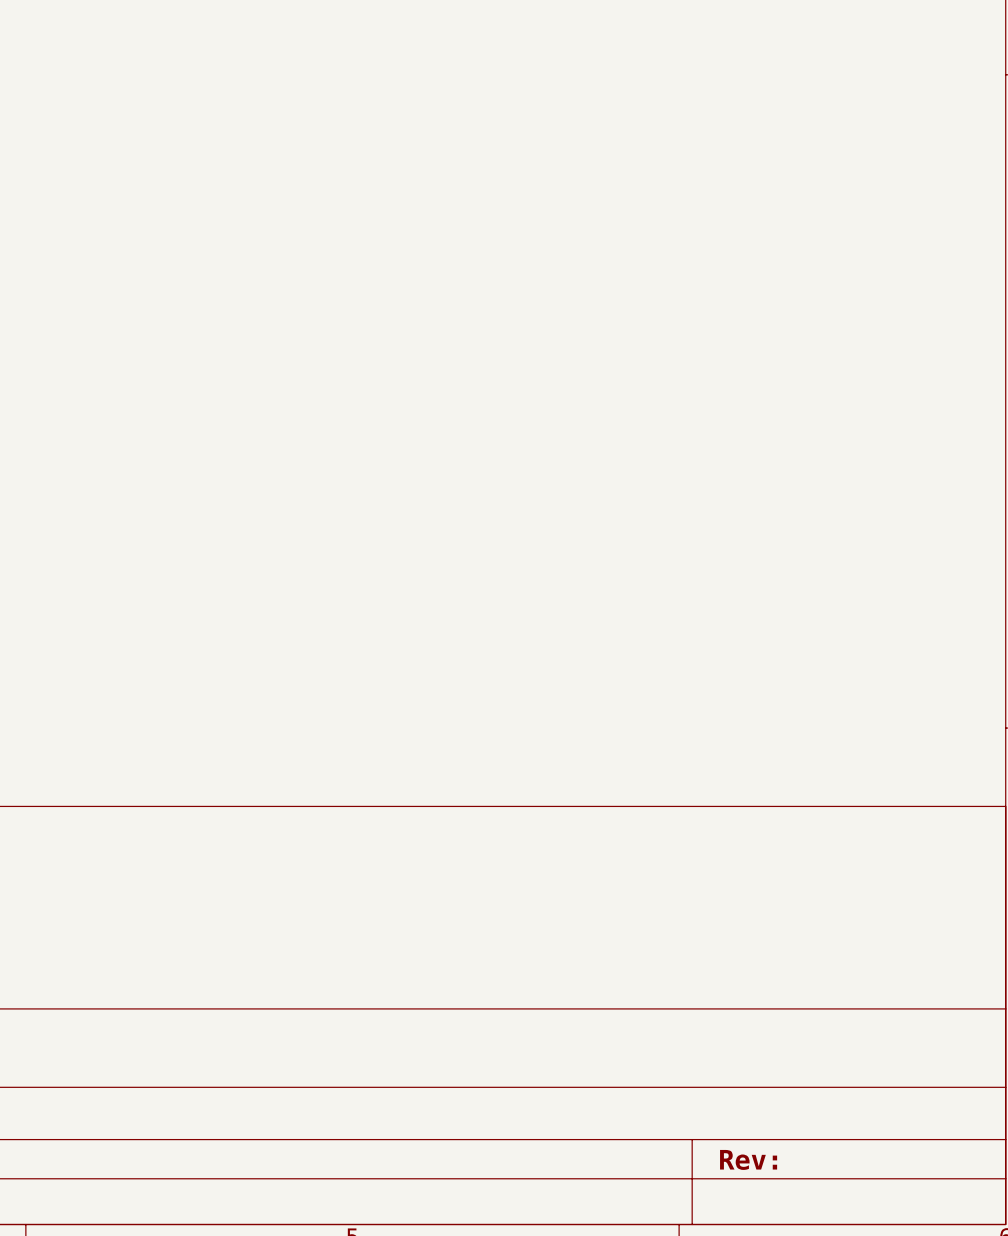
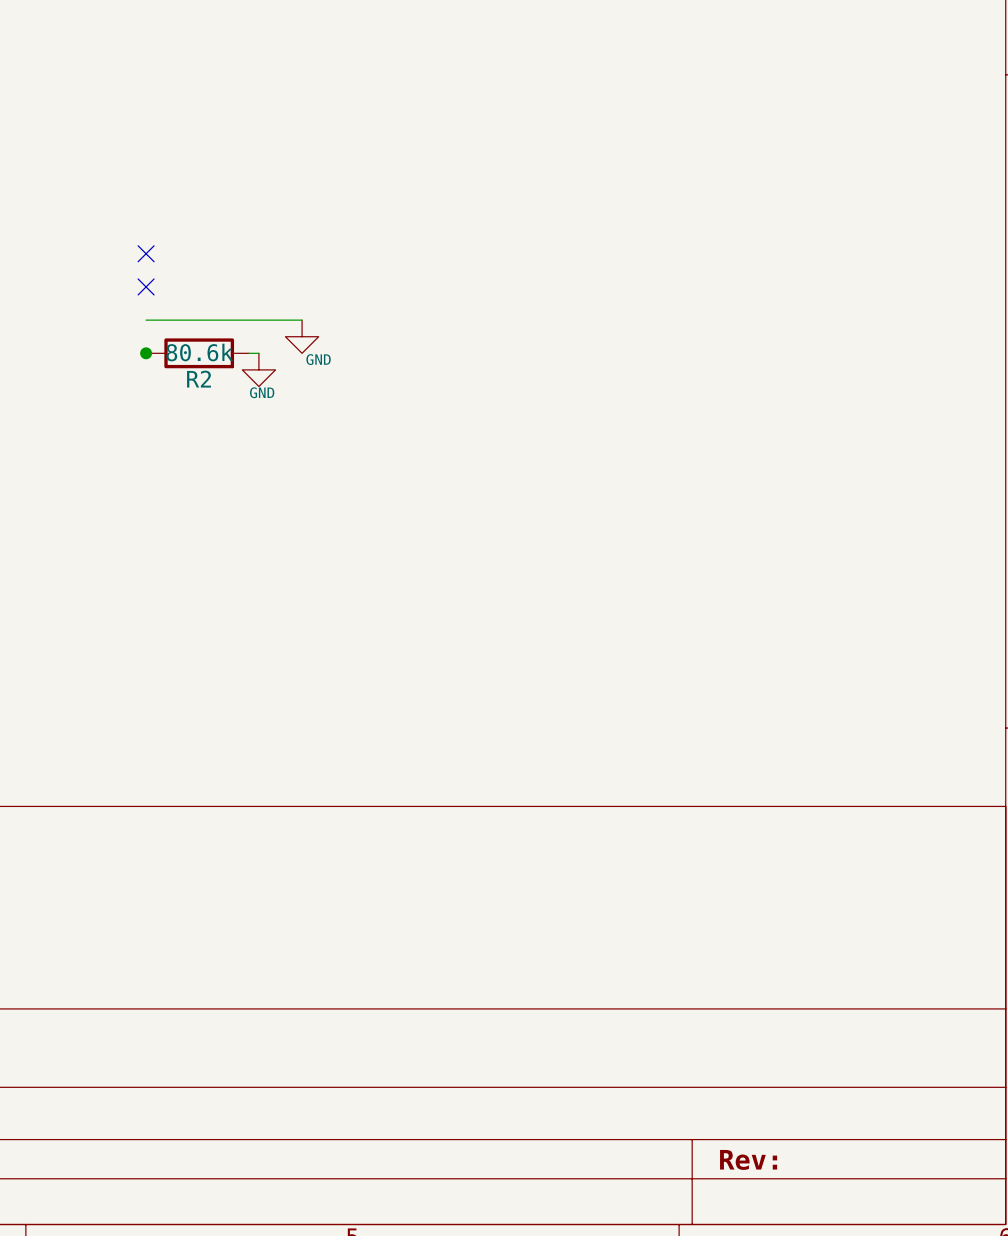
no-connect mark: none -> (146, 253)
no-connect mark: none -> (146, 286)
wire: none -> (146, 320) (302, 320)
power symbol: none -> GND (302, 336)
junction: none -> (146, 353)
R2: none -> 80.6k (199, 353)
wire: none -> (248, 353) (258, 353)
power symbol: none -> GND (258, 369)

